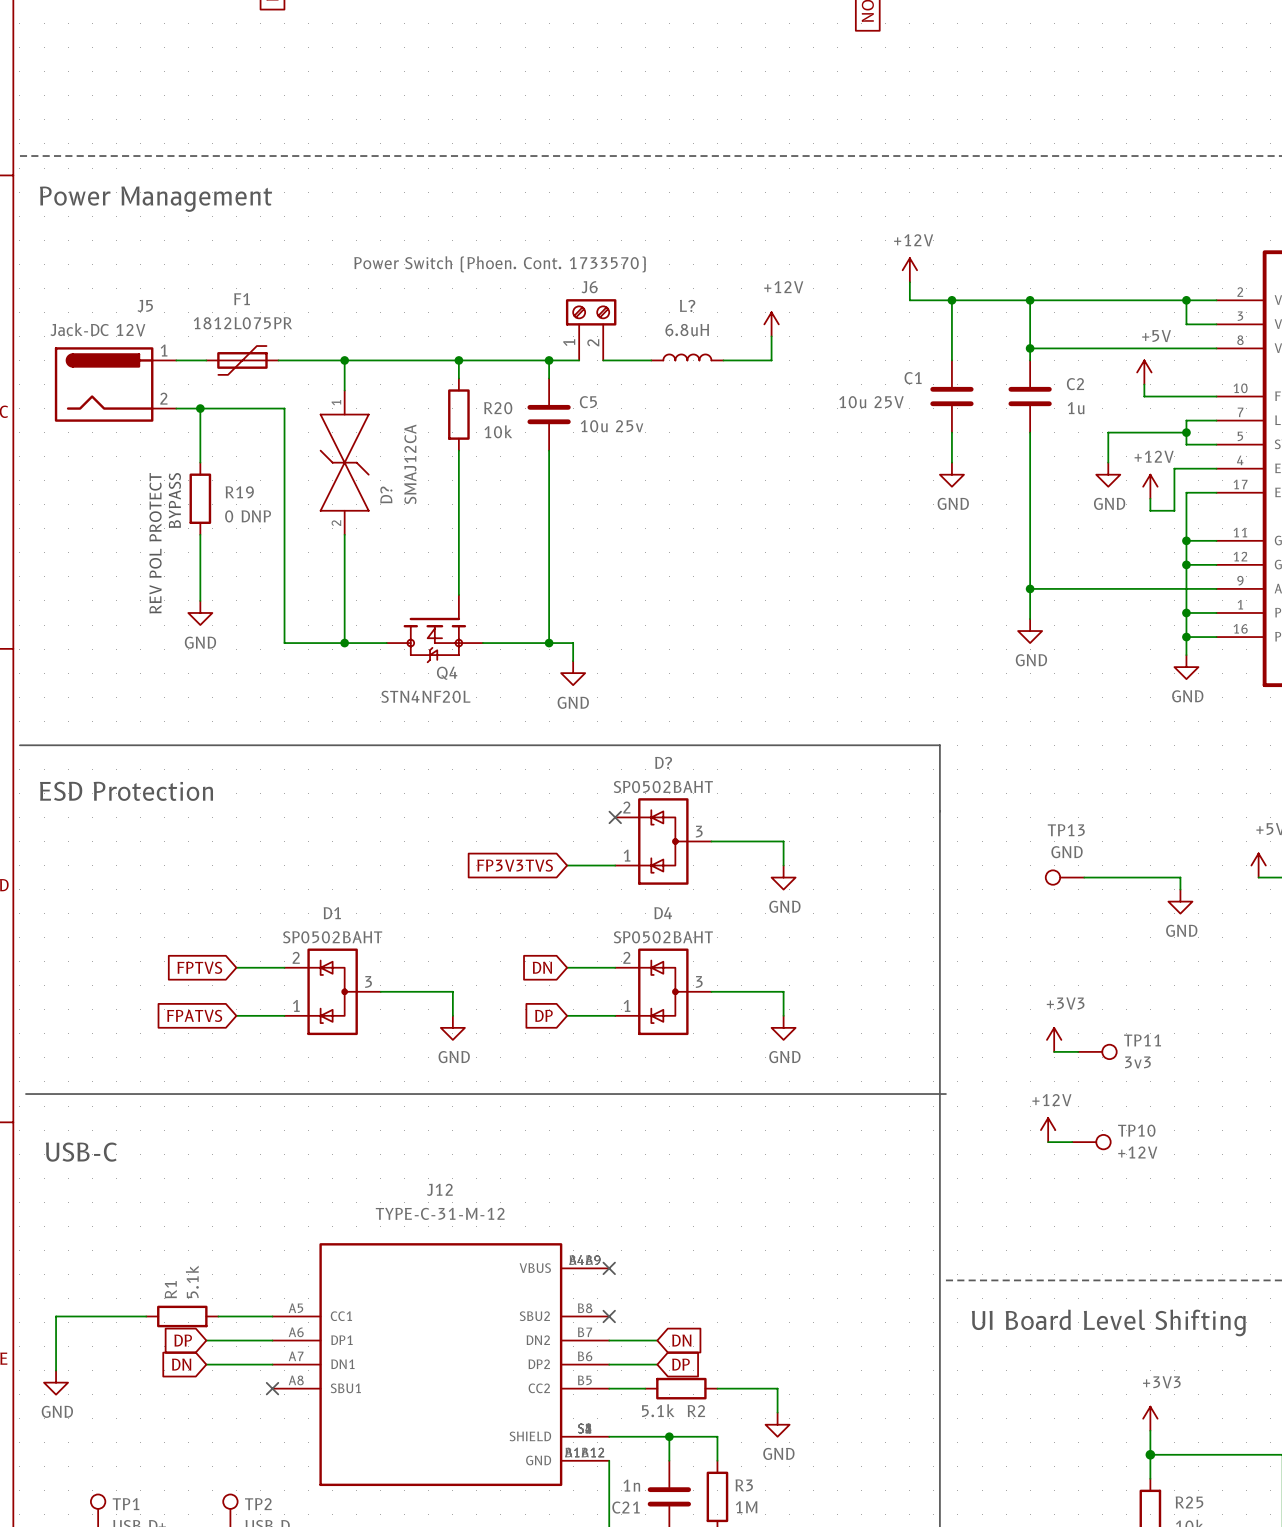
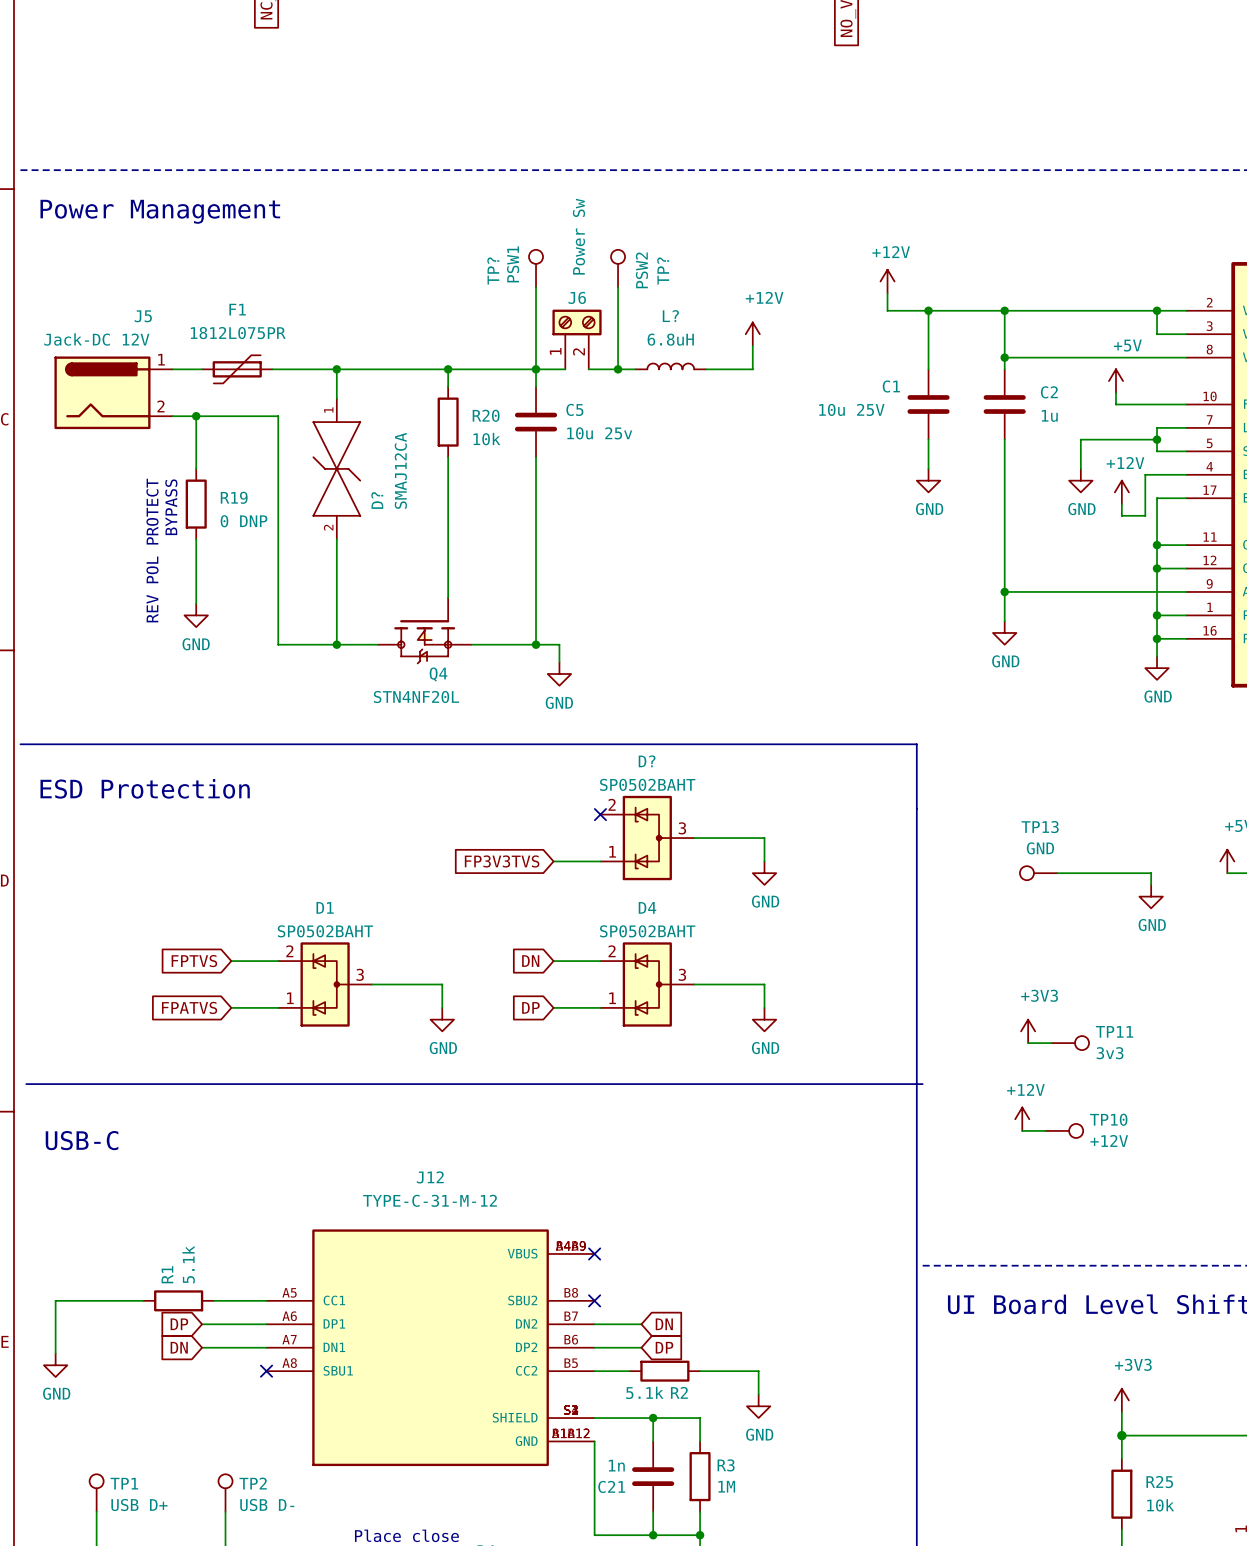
TP?: none -> PSW1 (536, 268)
TP?: none -> PSW2 (618, 268)
J6 value: Power Switch (Phoen. Cont. 1733570) (500, 264) -> Power Sw (578, 236)
wire: none -> (536, 287) (536, 369)
wire: none -> (618, 287) (618, 369)
junction: none -> (618, 369)

